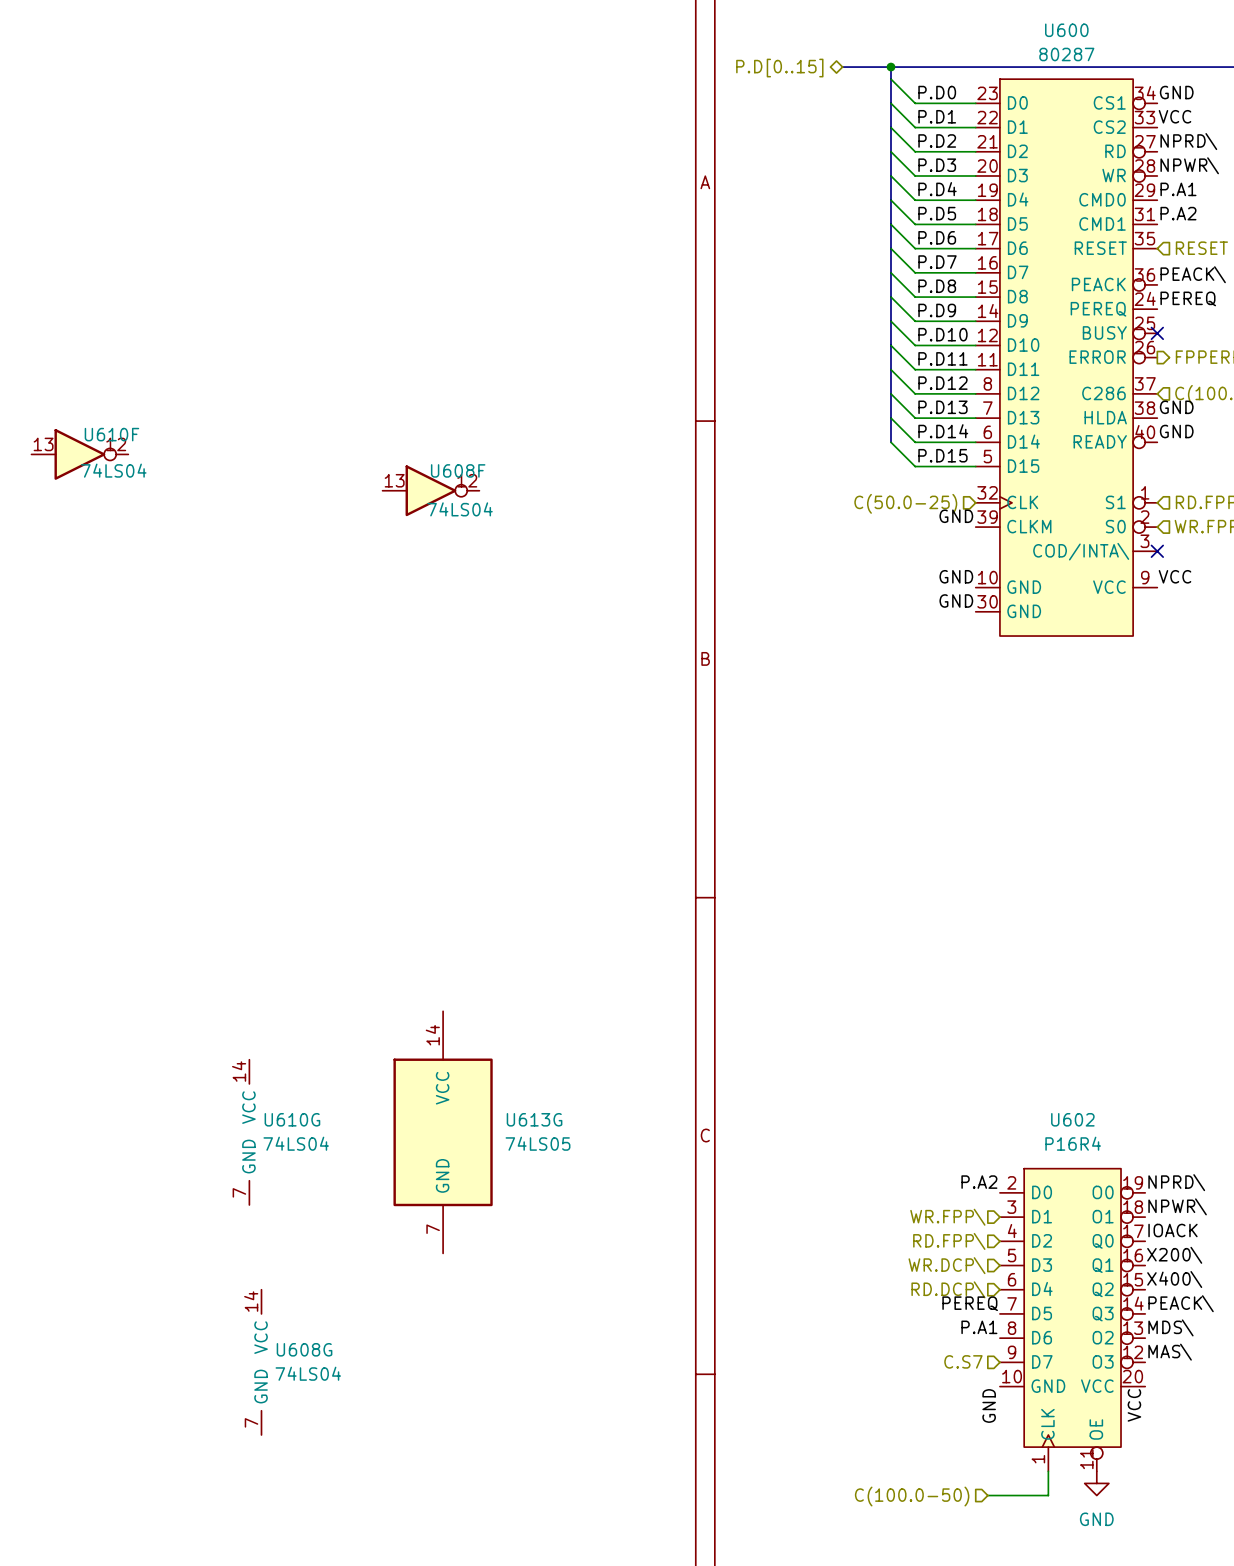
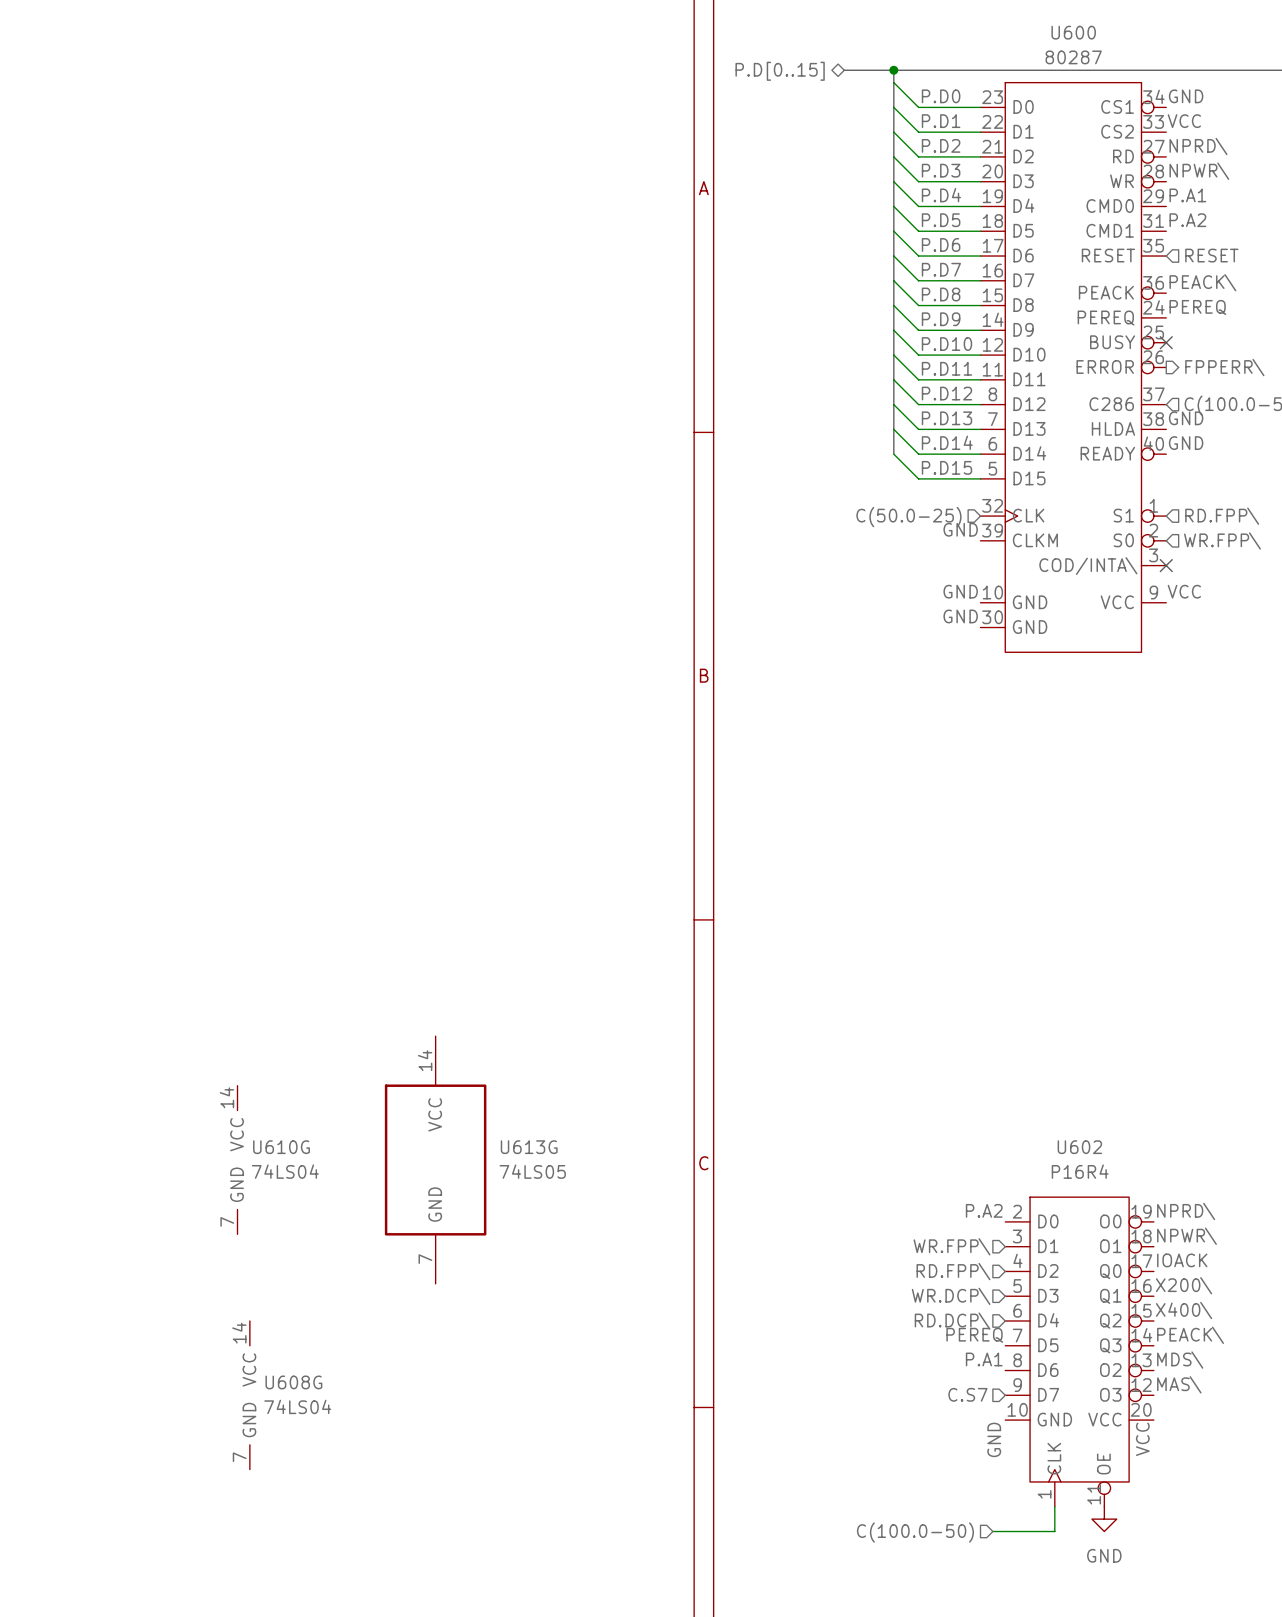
U610F: 74LS04 (79, 454) -> none
U608F: 74LS04 (430, 490) -> none

